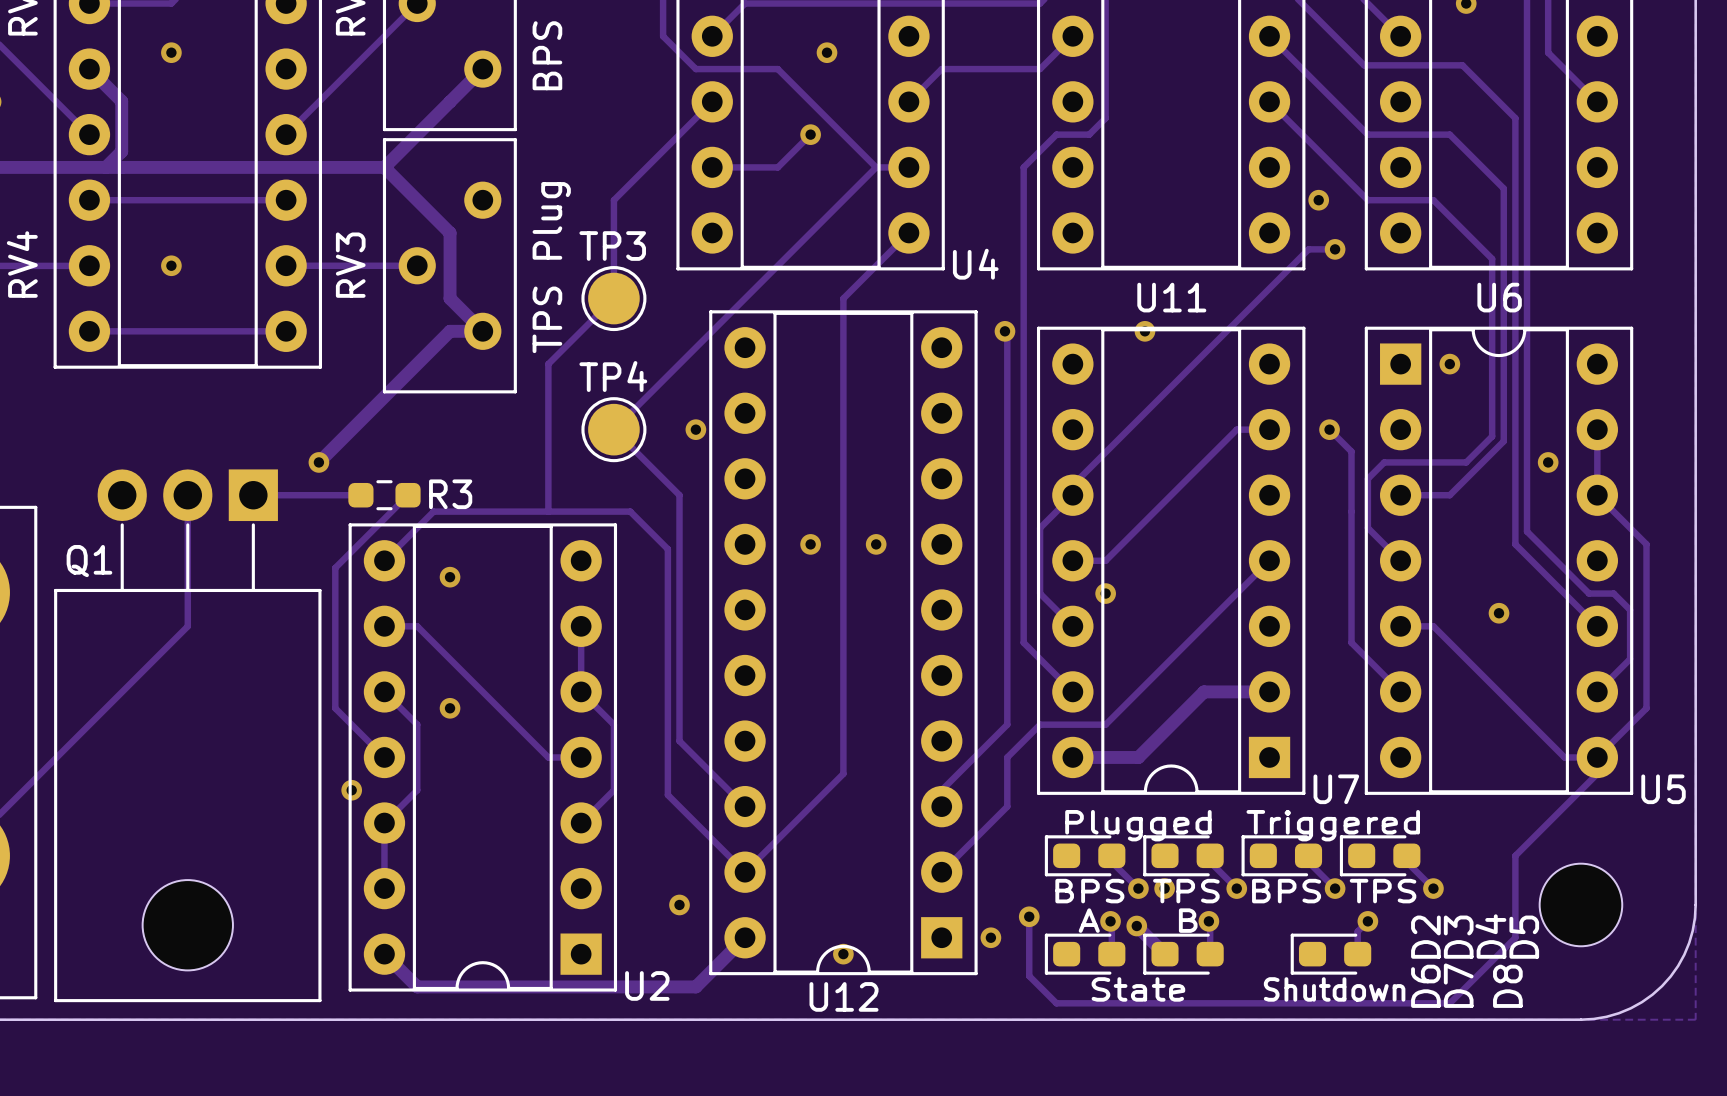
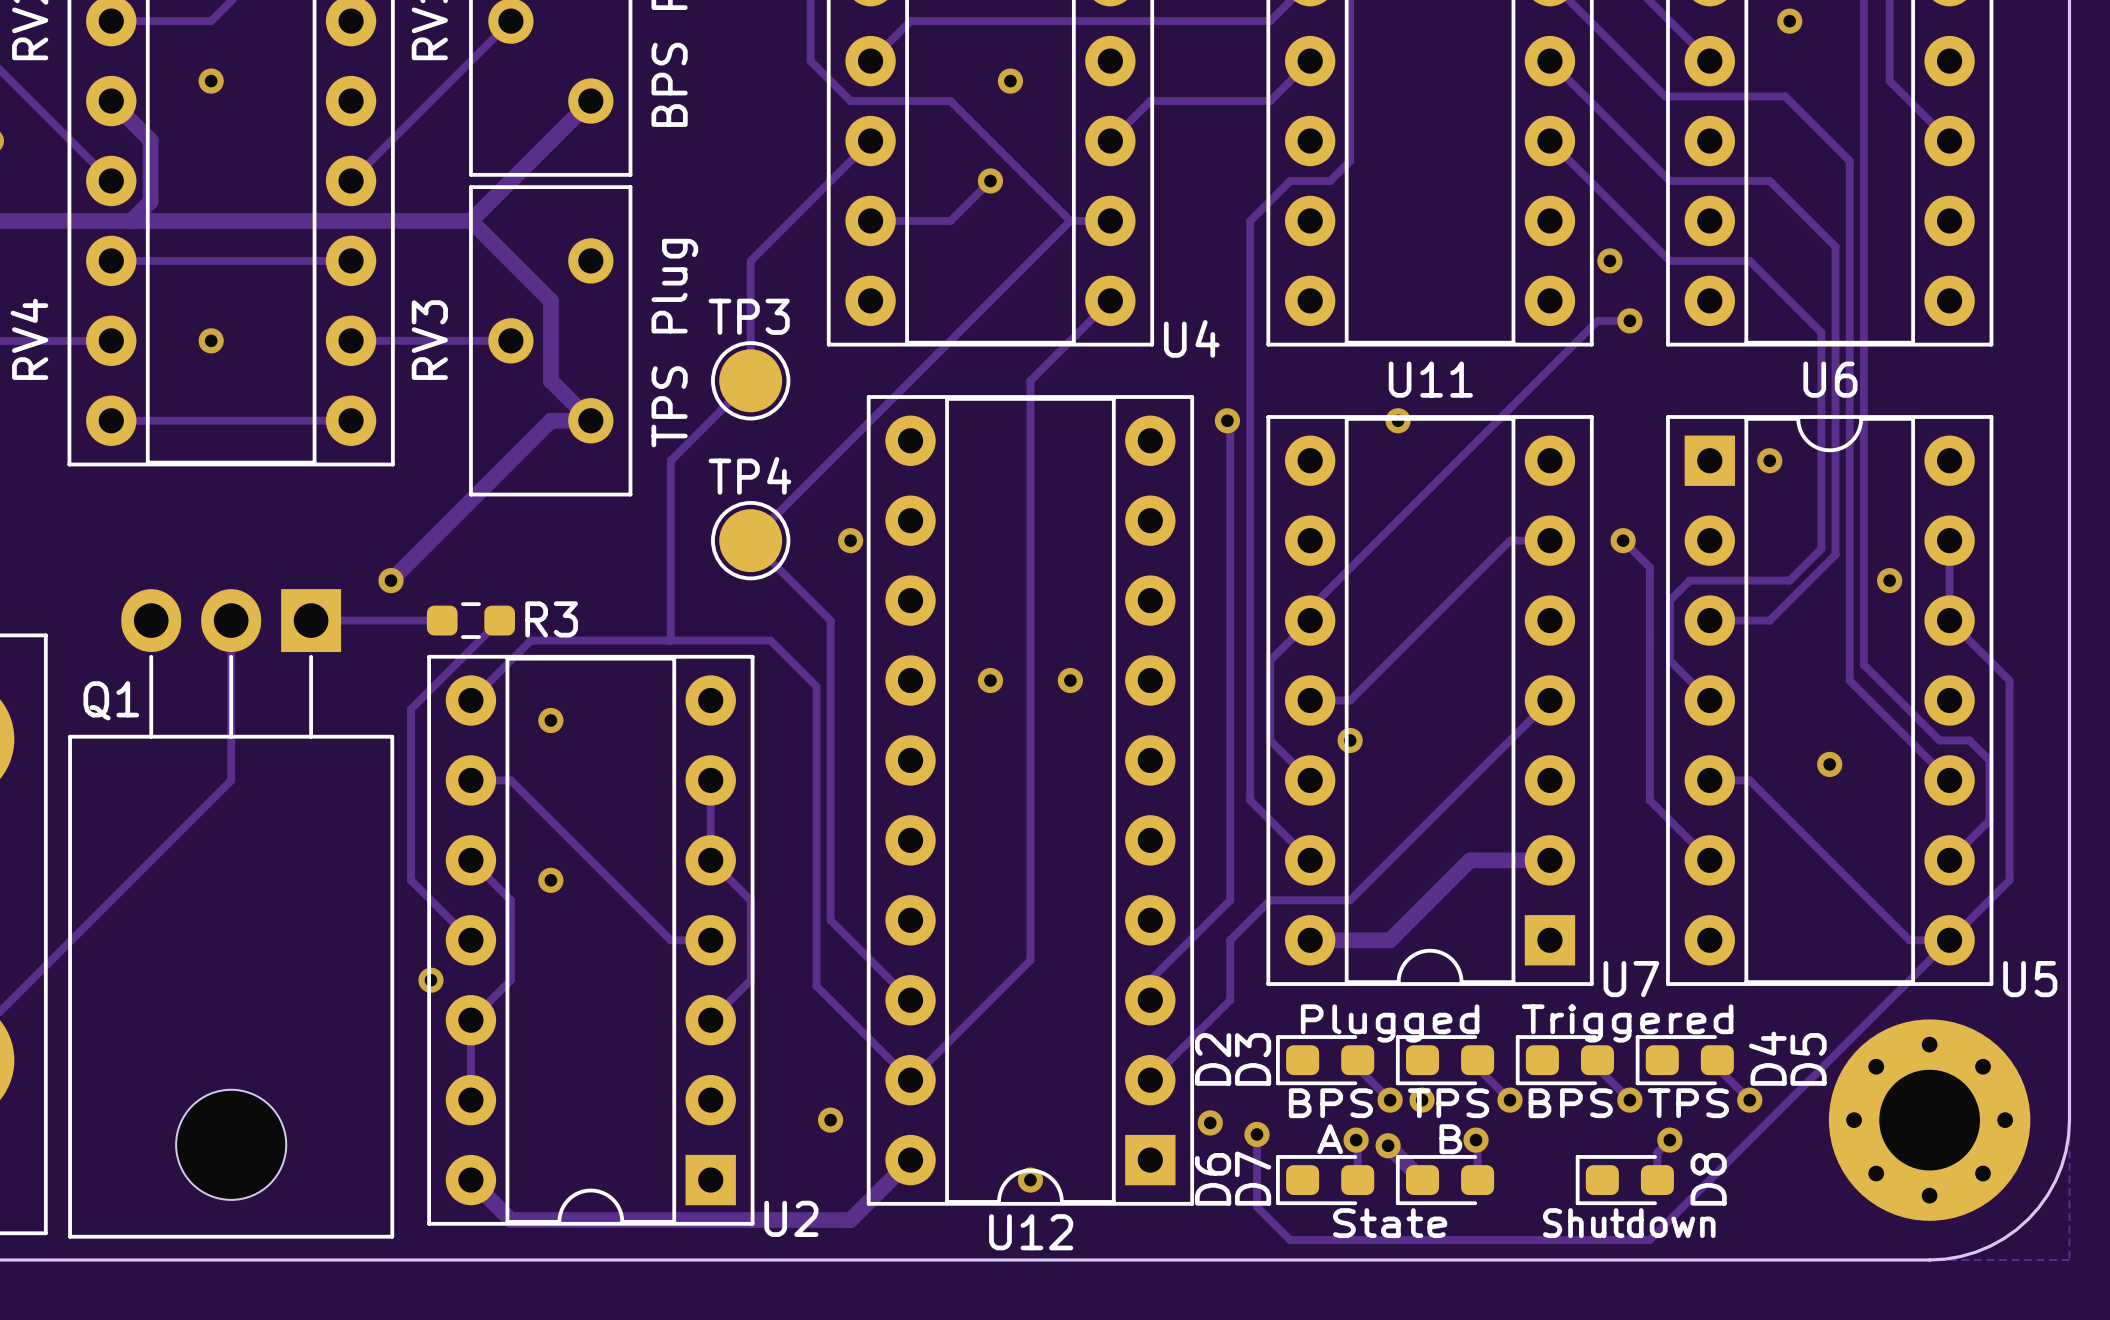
track: (1597, 757) (1597, 773) (1515, 855) (1515, 937) (1449, 1003) (1351, 1003) -> (1949, 940) (1649, 1240)
part footprint: [1539, 863, 1623, 947] -> [1828, 1019, 2031, 1221]
D4 name position: D4 (1490, 936) -> D4 (1767, 1058)
via position: (990, 937) -> (1210, 1122)
D2 name position: D2 (1425, 937) -> D2 (1213, 1059)
D3 name position: D3 (1458, 937) -> D3 (1253, 1059)
D5 name position: D5 (1524, 937) -> D5 (1808, 1059)
D7 name position: D7 (1458, 985) -> D7 (1253, 1178)
D6 name position: D6 (1425, 986) -> D6 (1213, 1179)
D8 name position: D8 (1507, 986) -> D8 (1708, 1179)

